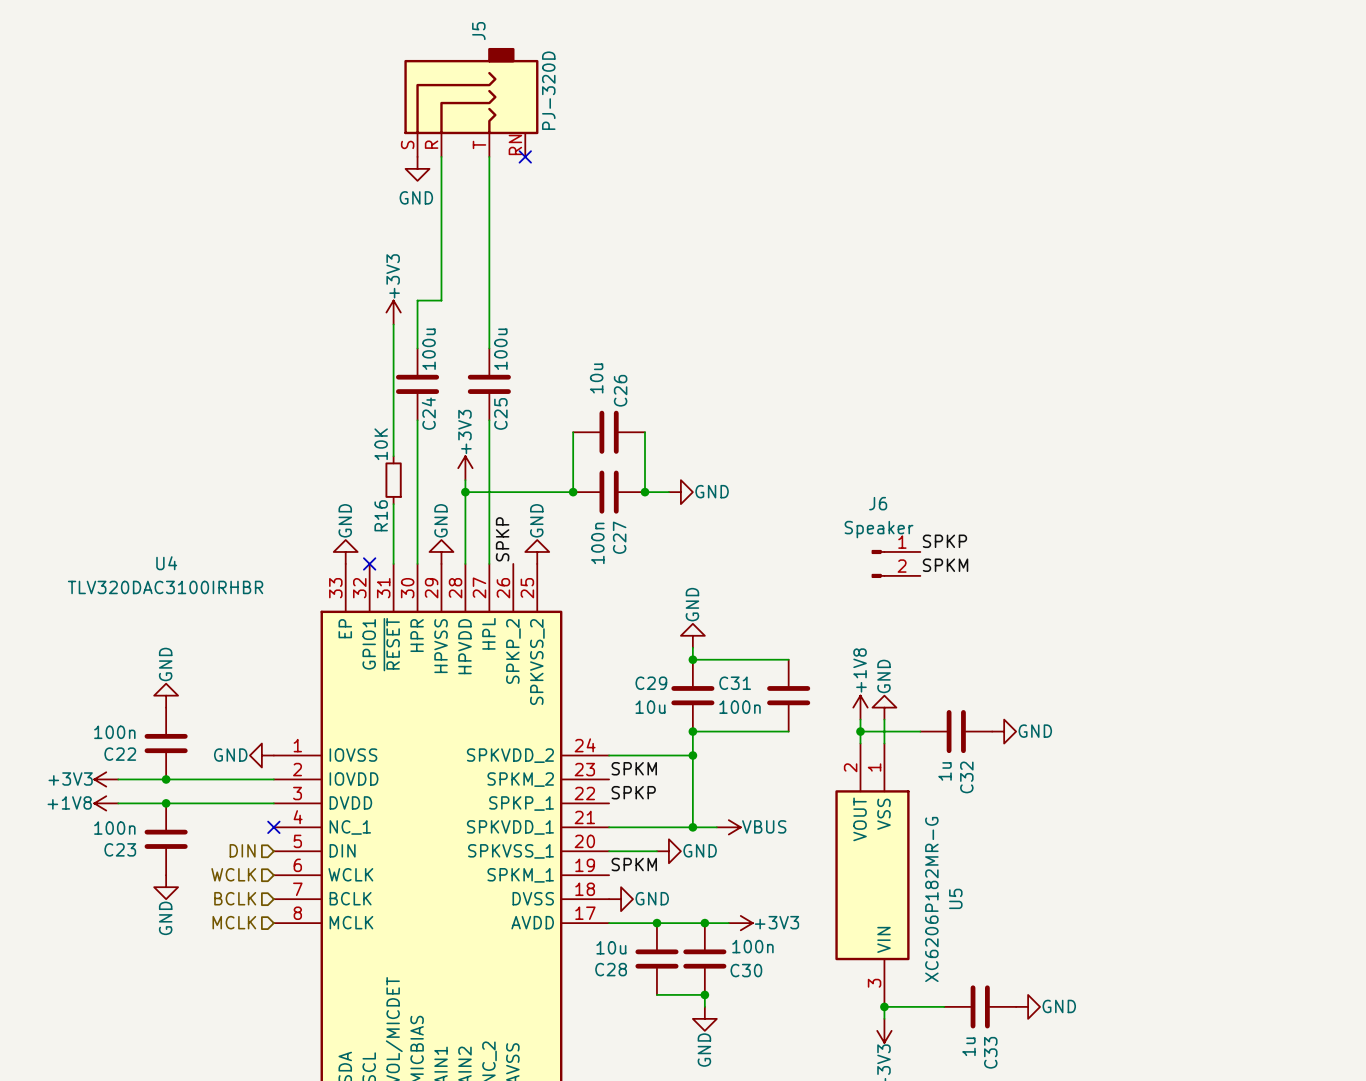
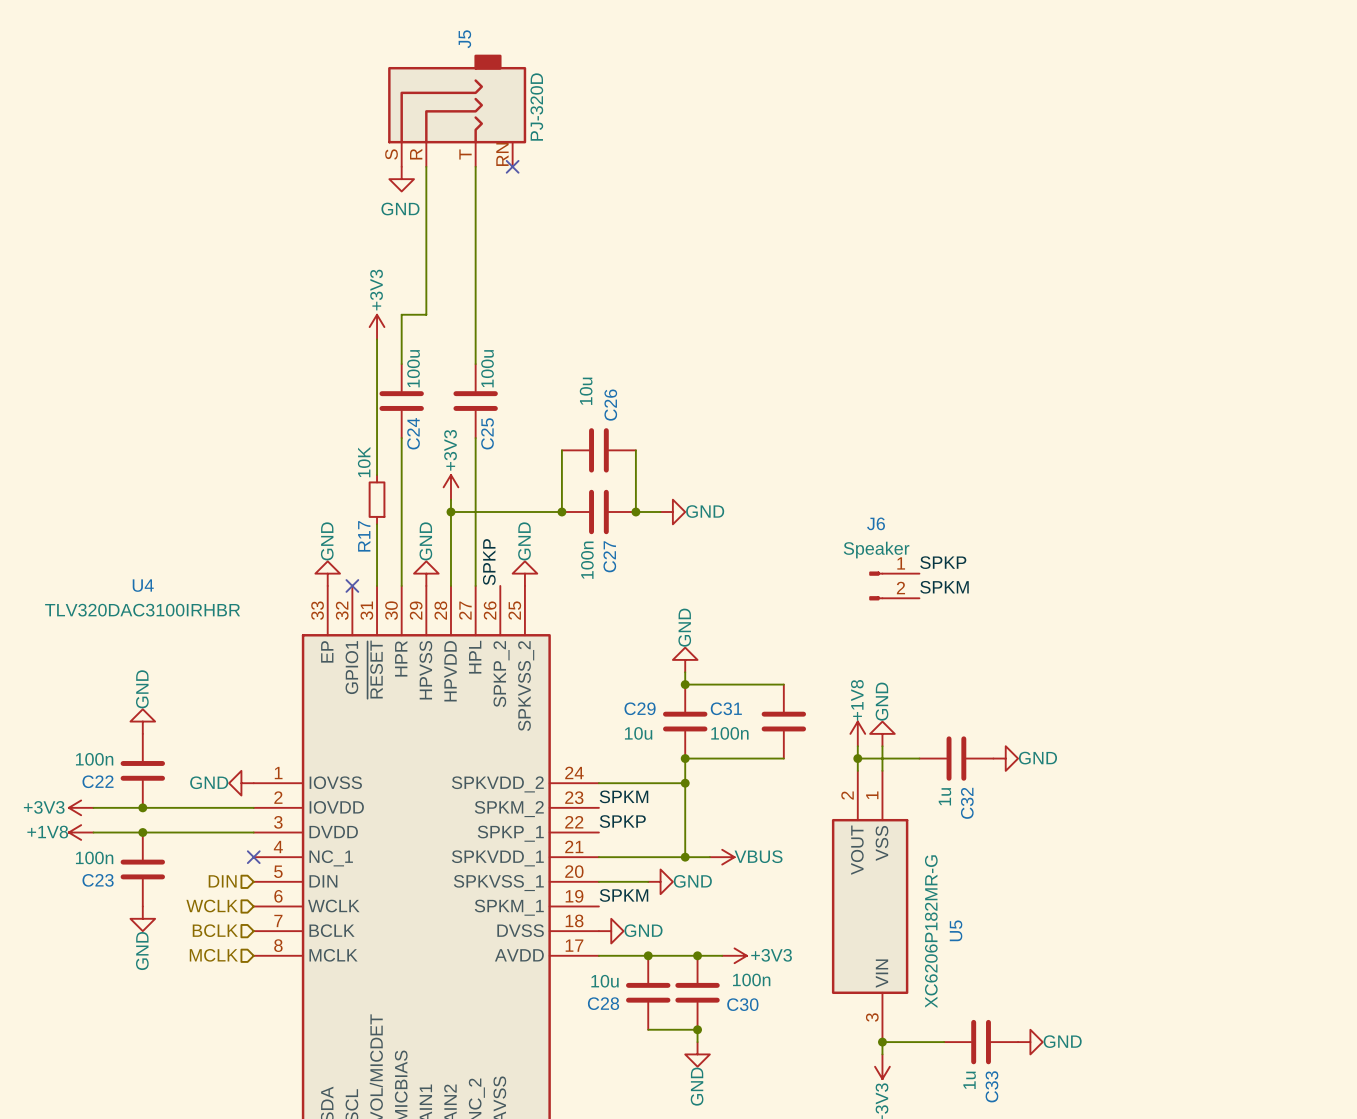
R16 name: R16 (381, 515) -> R17 (364, 536)

